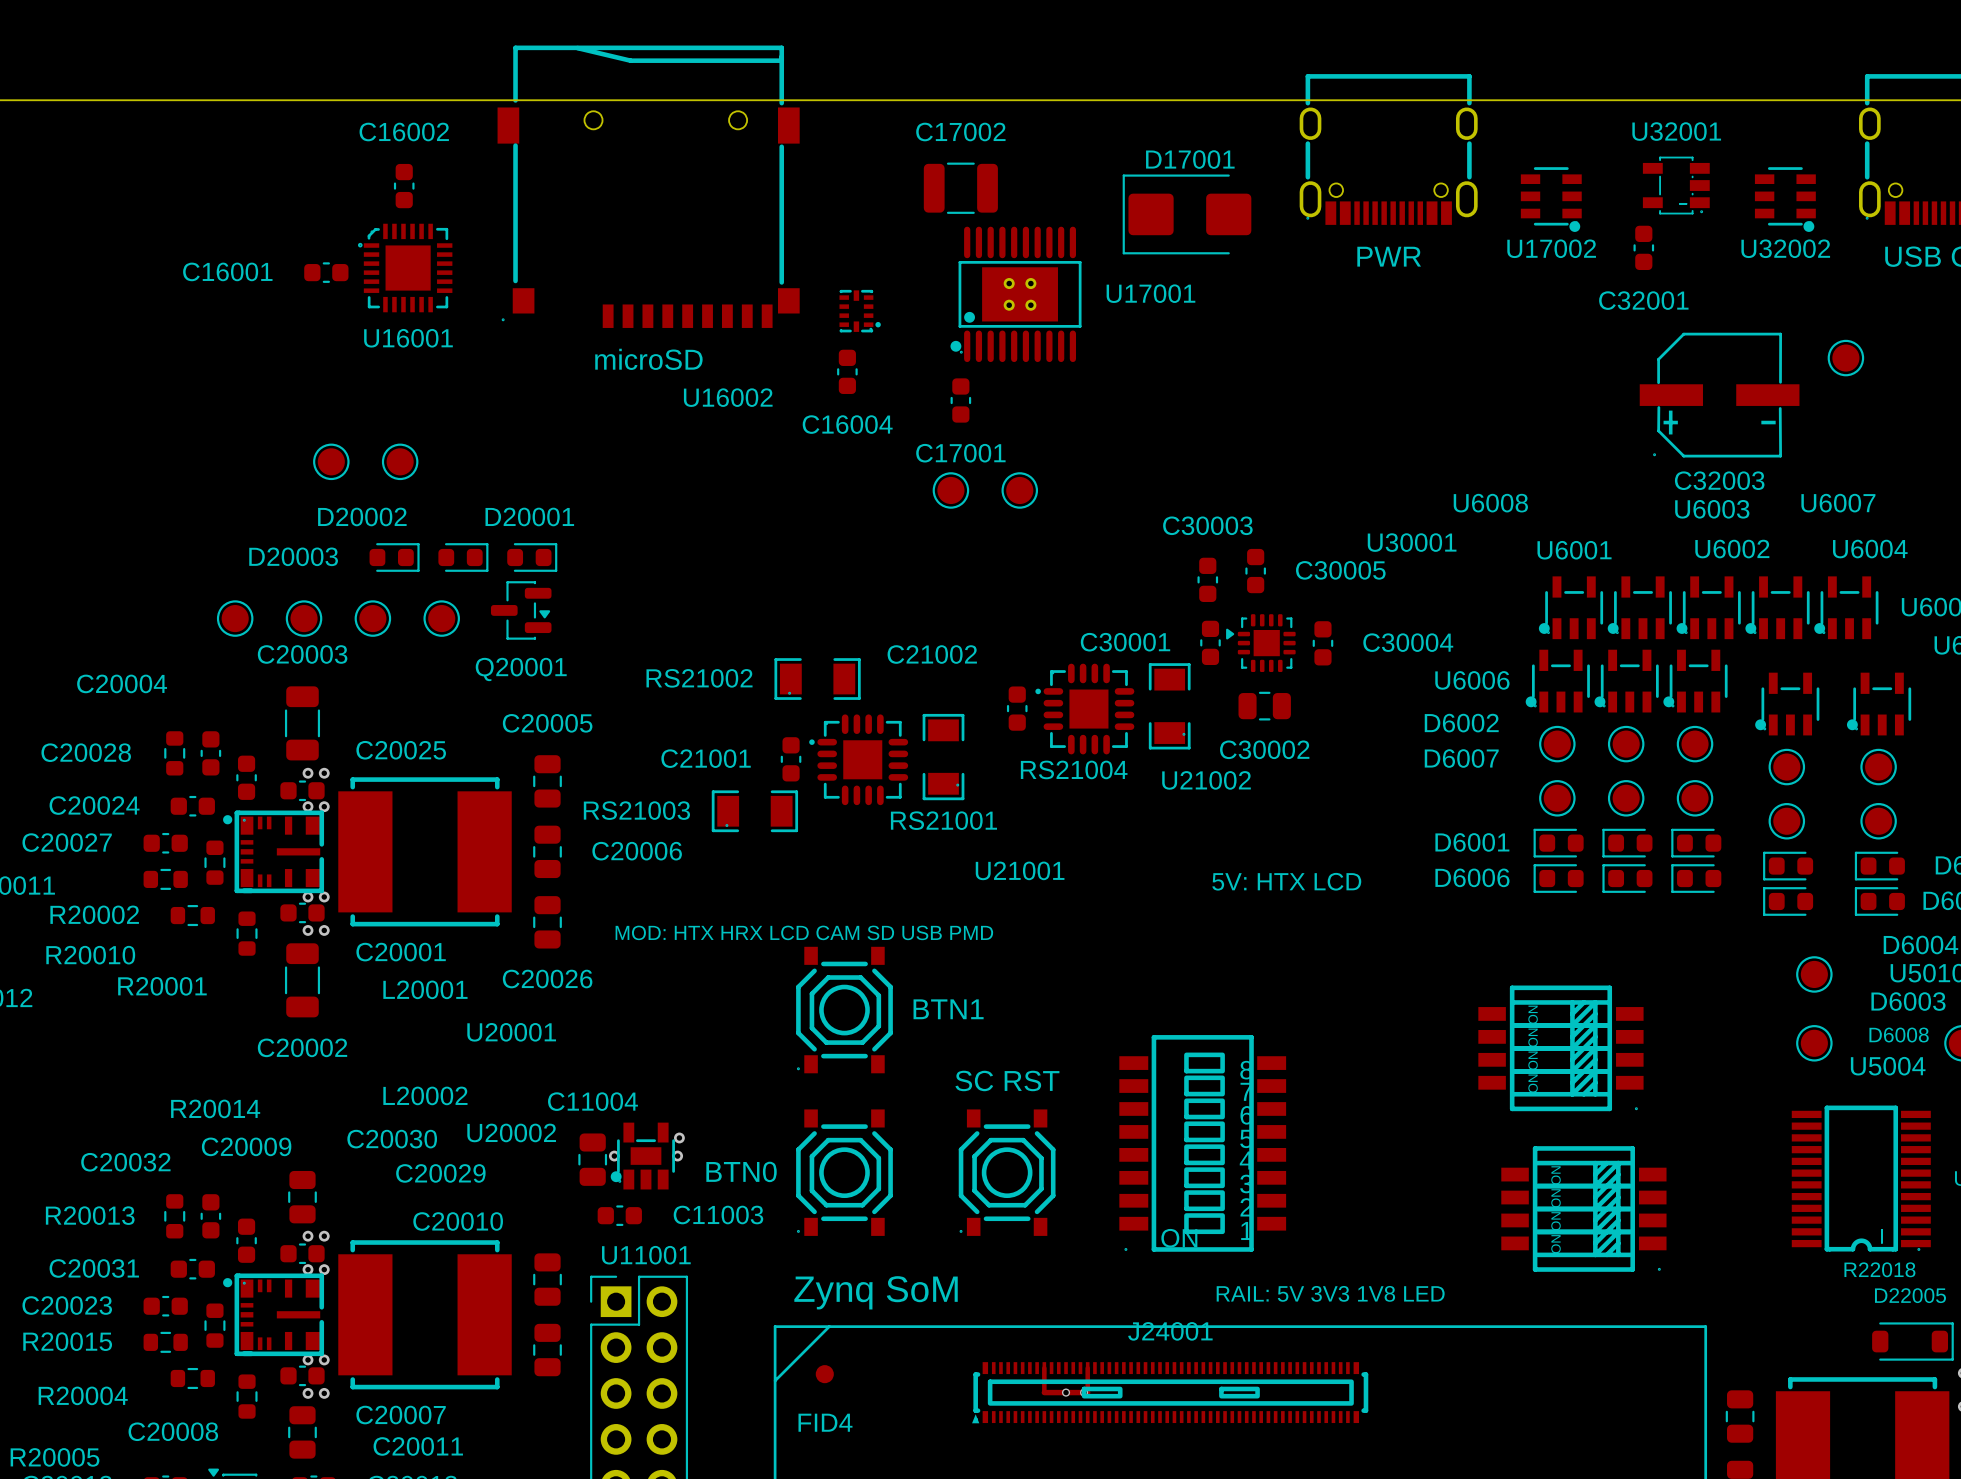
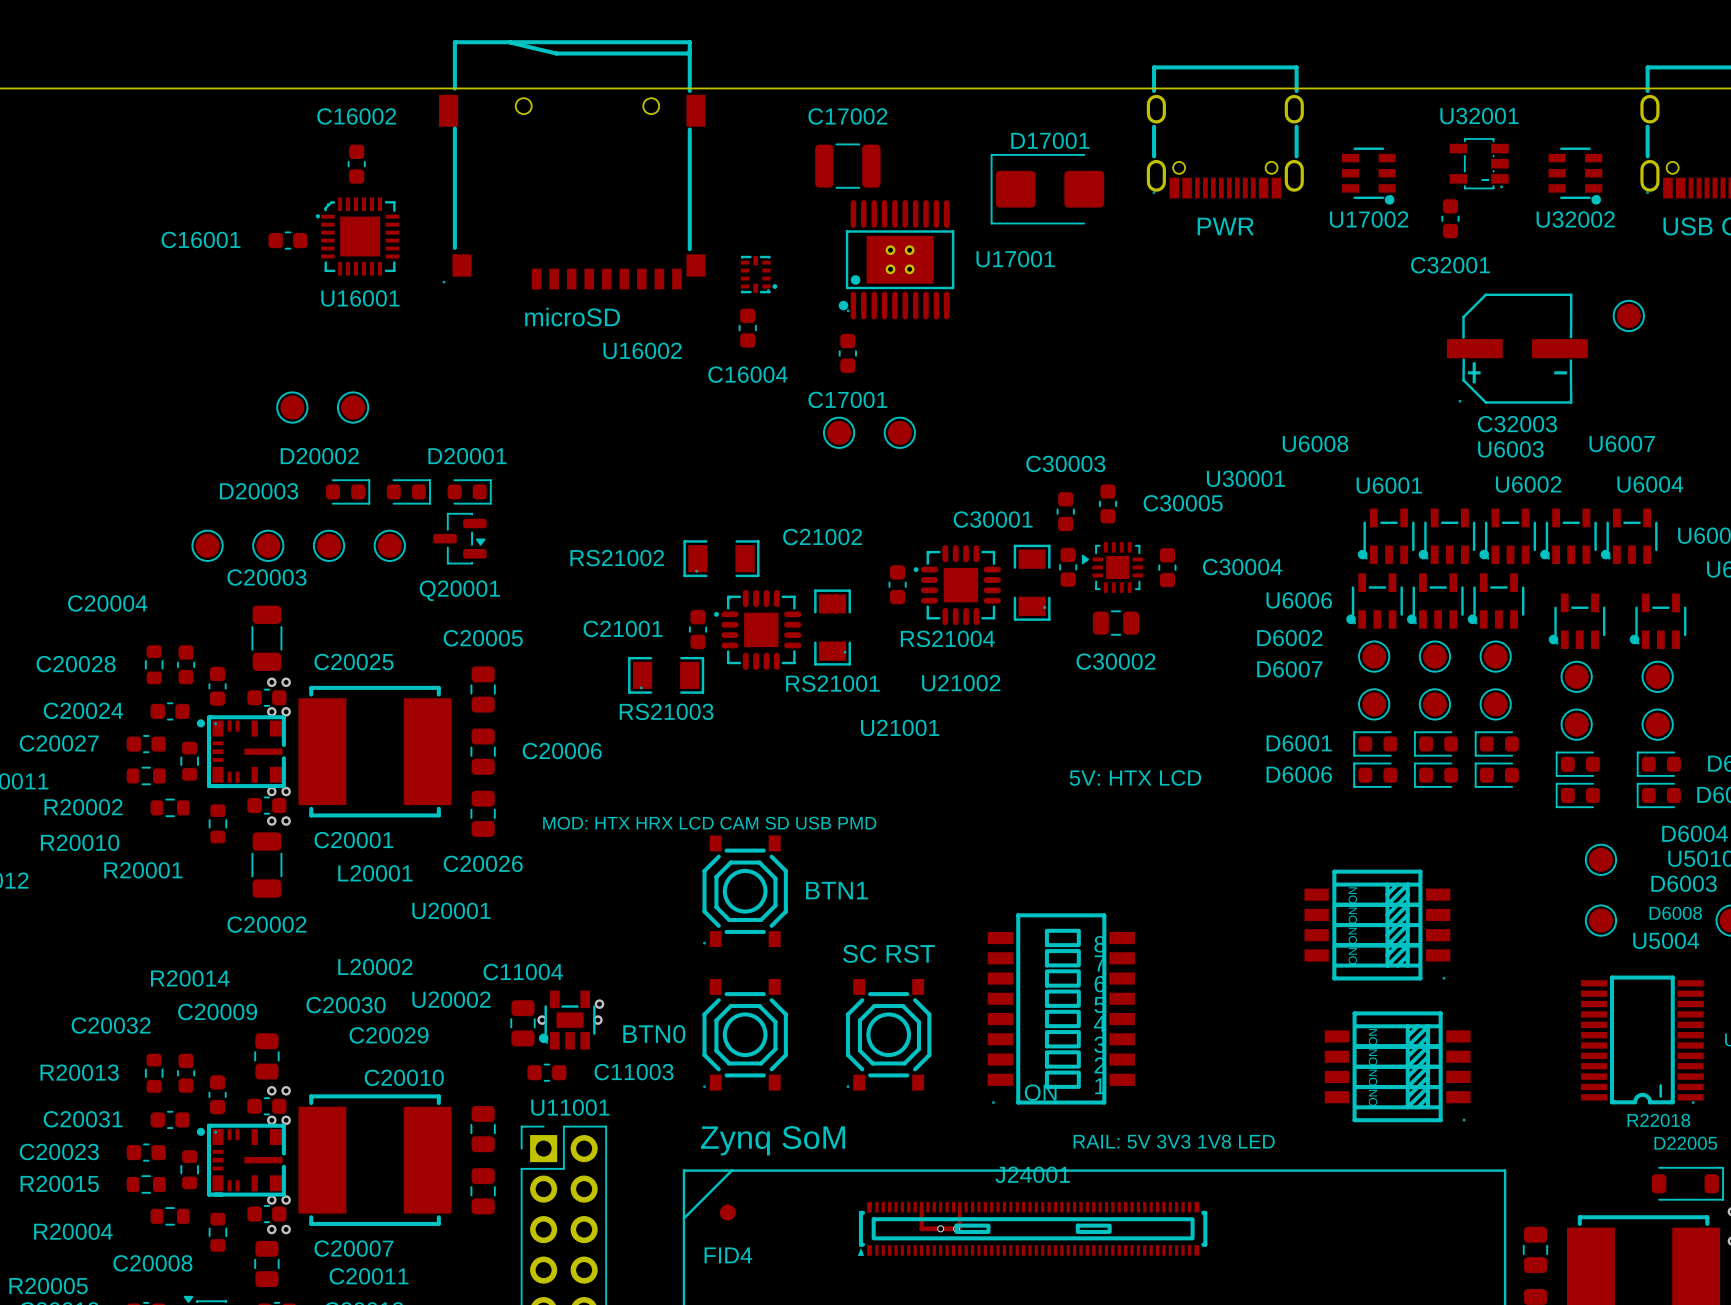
C30001 name position: C30001 (1125, 642) -> C30001 (993, 519)
RS21002 position: (817, 679) -> (721, 558)
RS21004 position: (1169, 706) -> (1032, 582)
C21002 position: (1017, 708) -> (897, 584)
U21002 position: (1084, 709) -> (957, 585)
RS21001 position: (943, 757) -> (832, 627)
C21001 position: (791, 759) -> (698, 629)
U21001 position: (858, 759) -> (757, 629)
U21002 name position: U21002 (1206, 780) -> U21002 (961, 683)
RS21003 name position: RS21003 (636, 810) -> RS21003 (666, 711)
RS21003 position: (754, 811) -> (666, 675)

